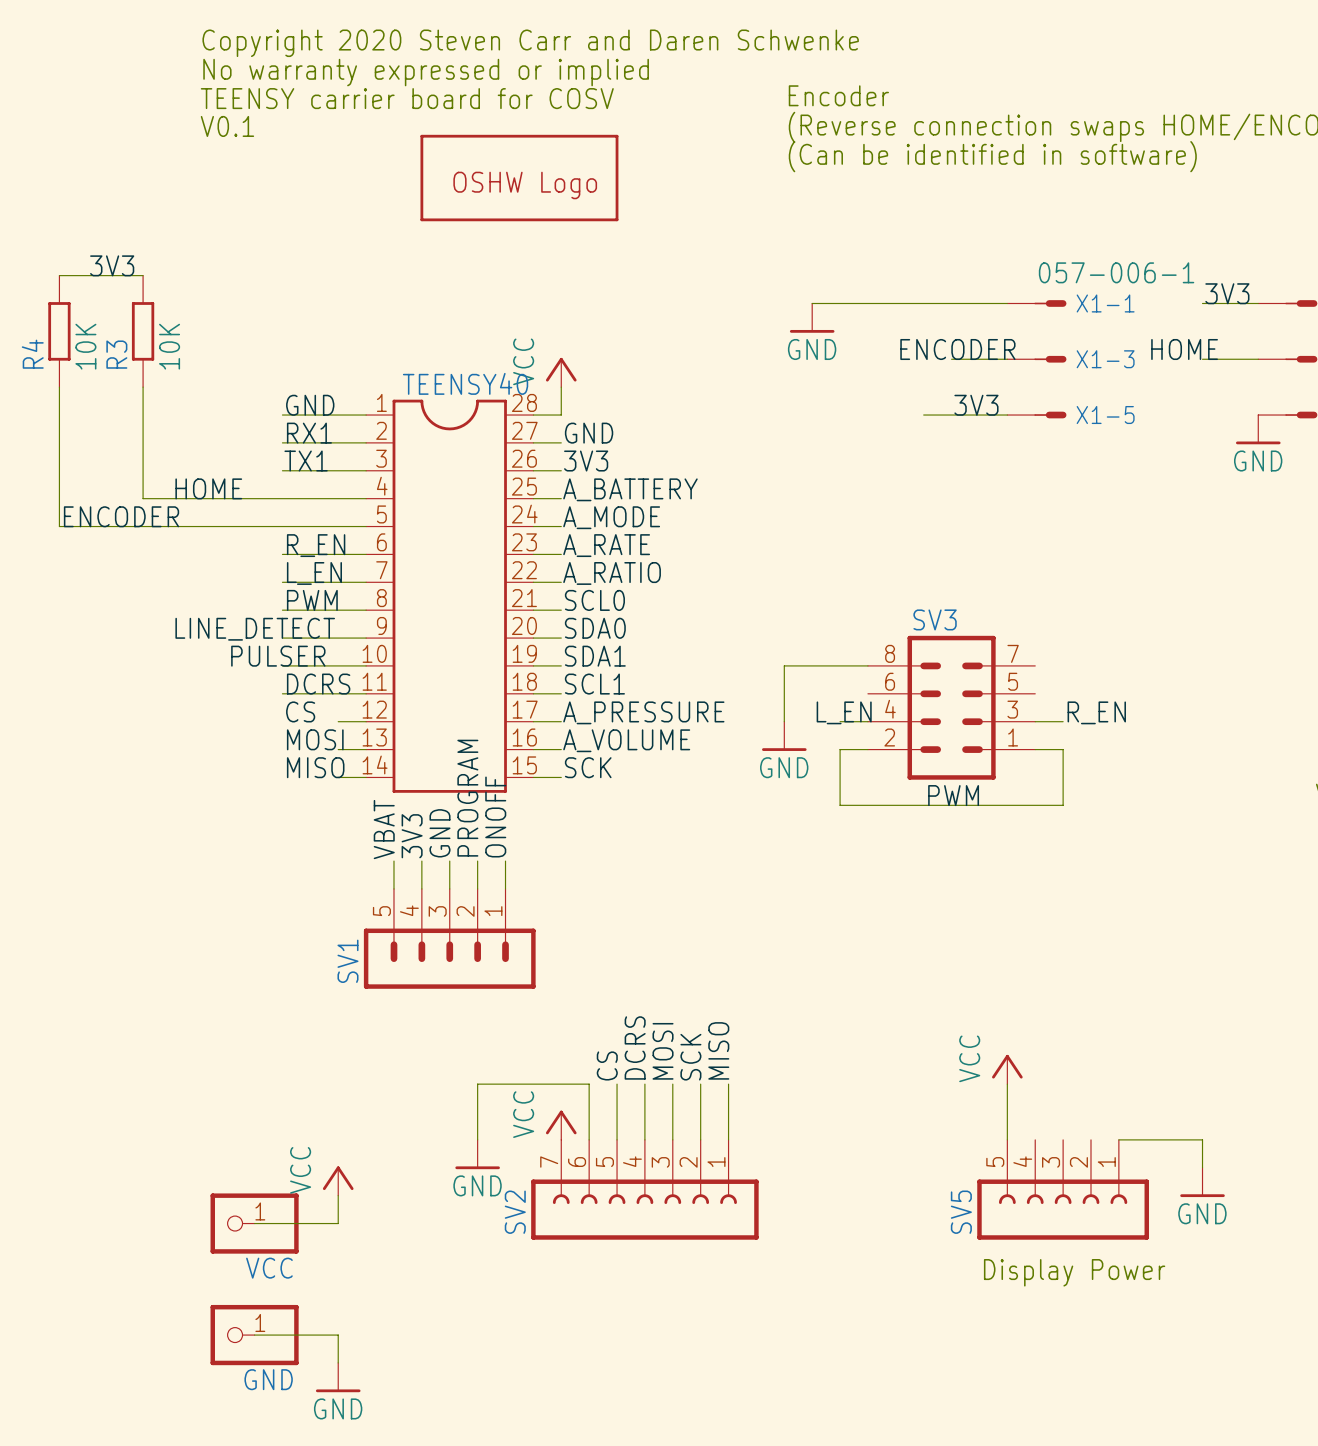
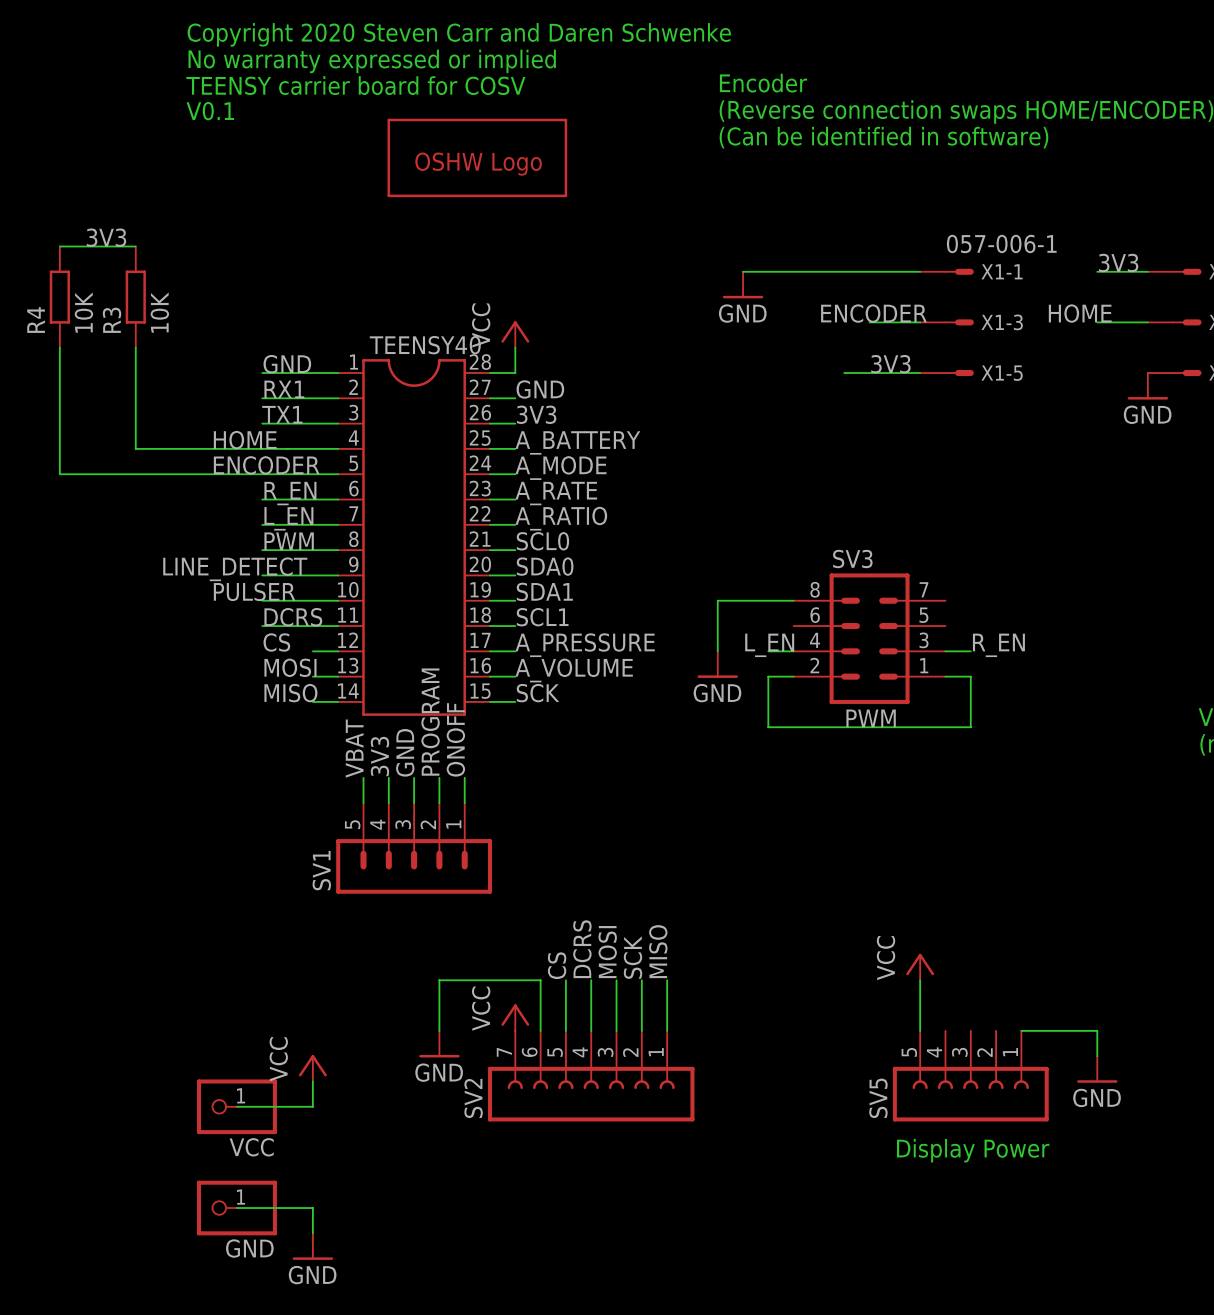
label position: HOME (208, 488) -> HOME (245, 440)
label position: ENCODER (121, 516) -> ENCODER (266, 465)

